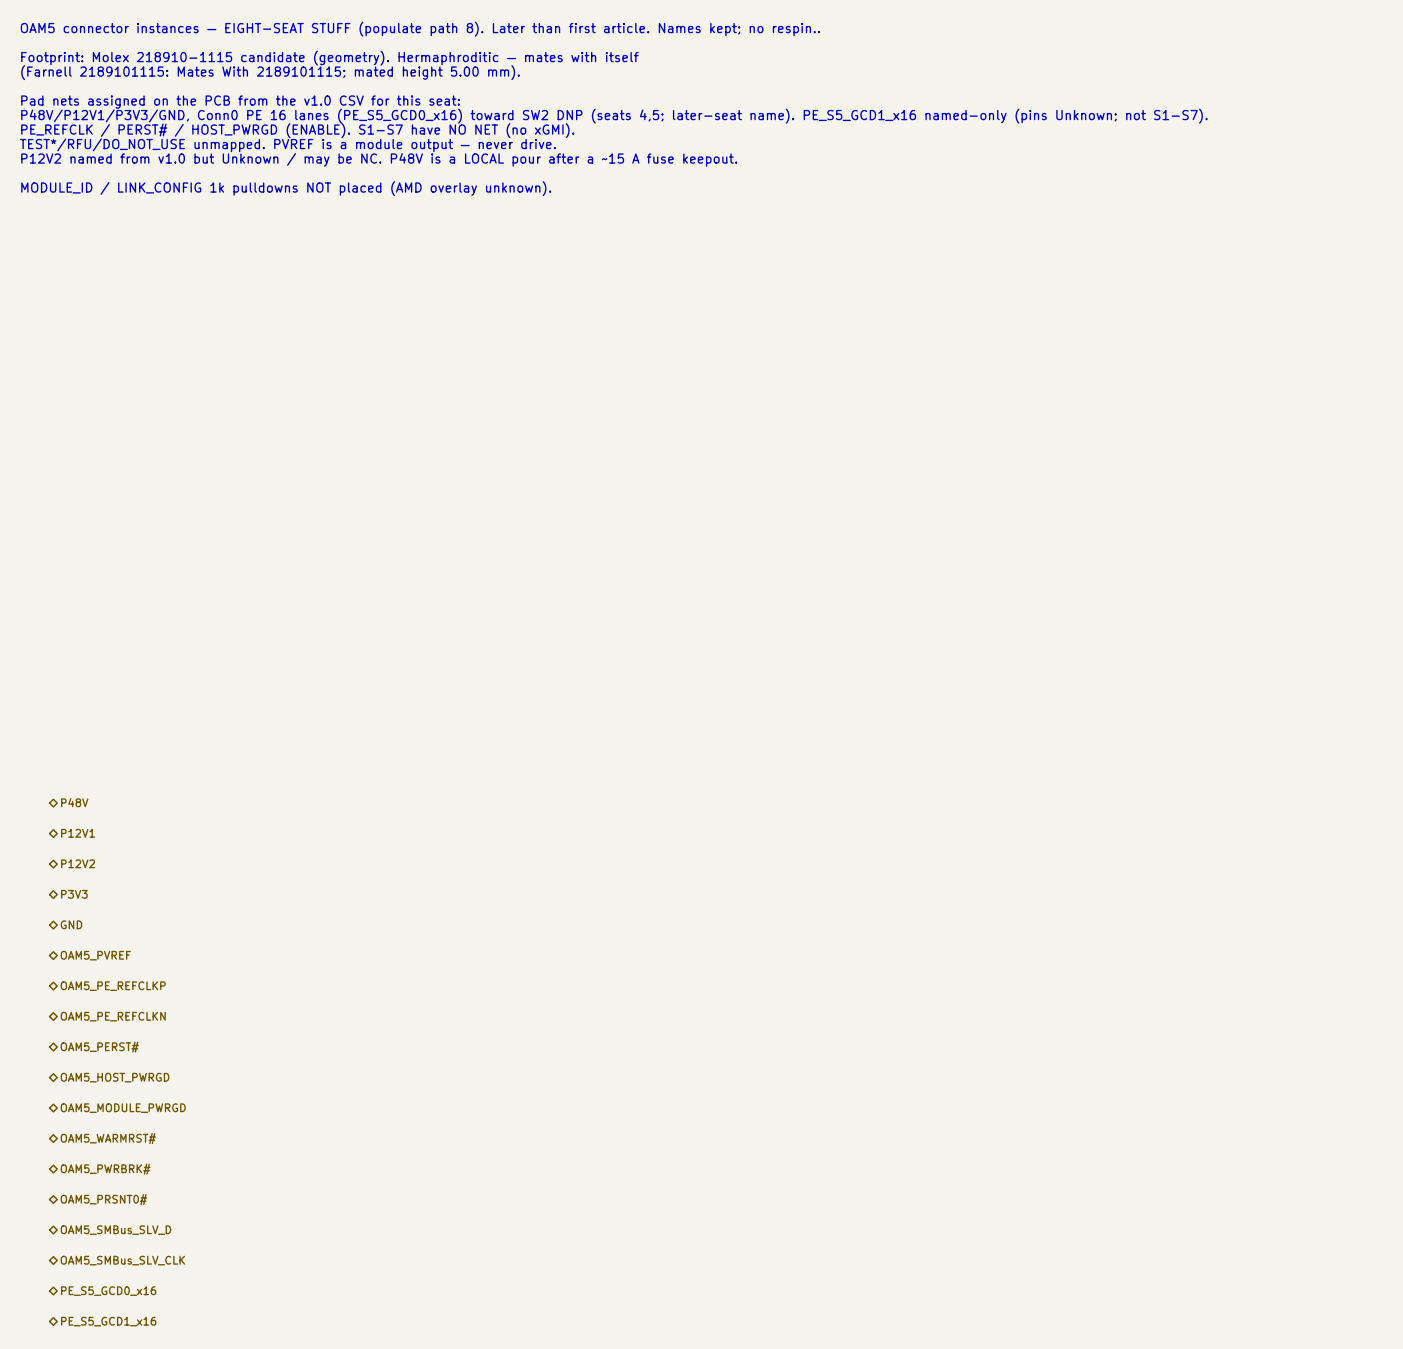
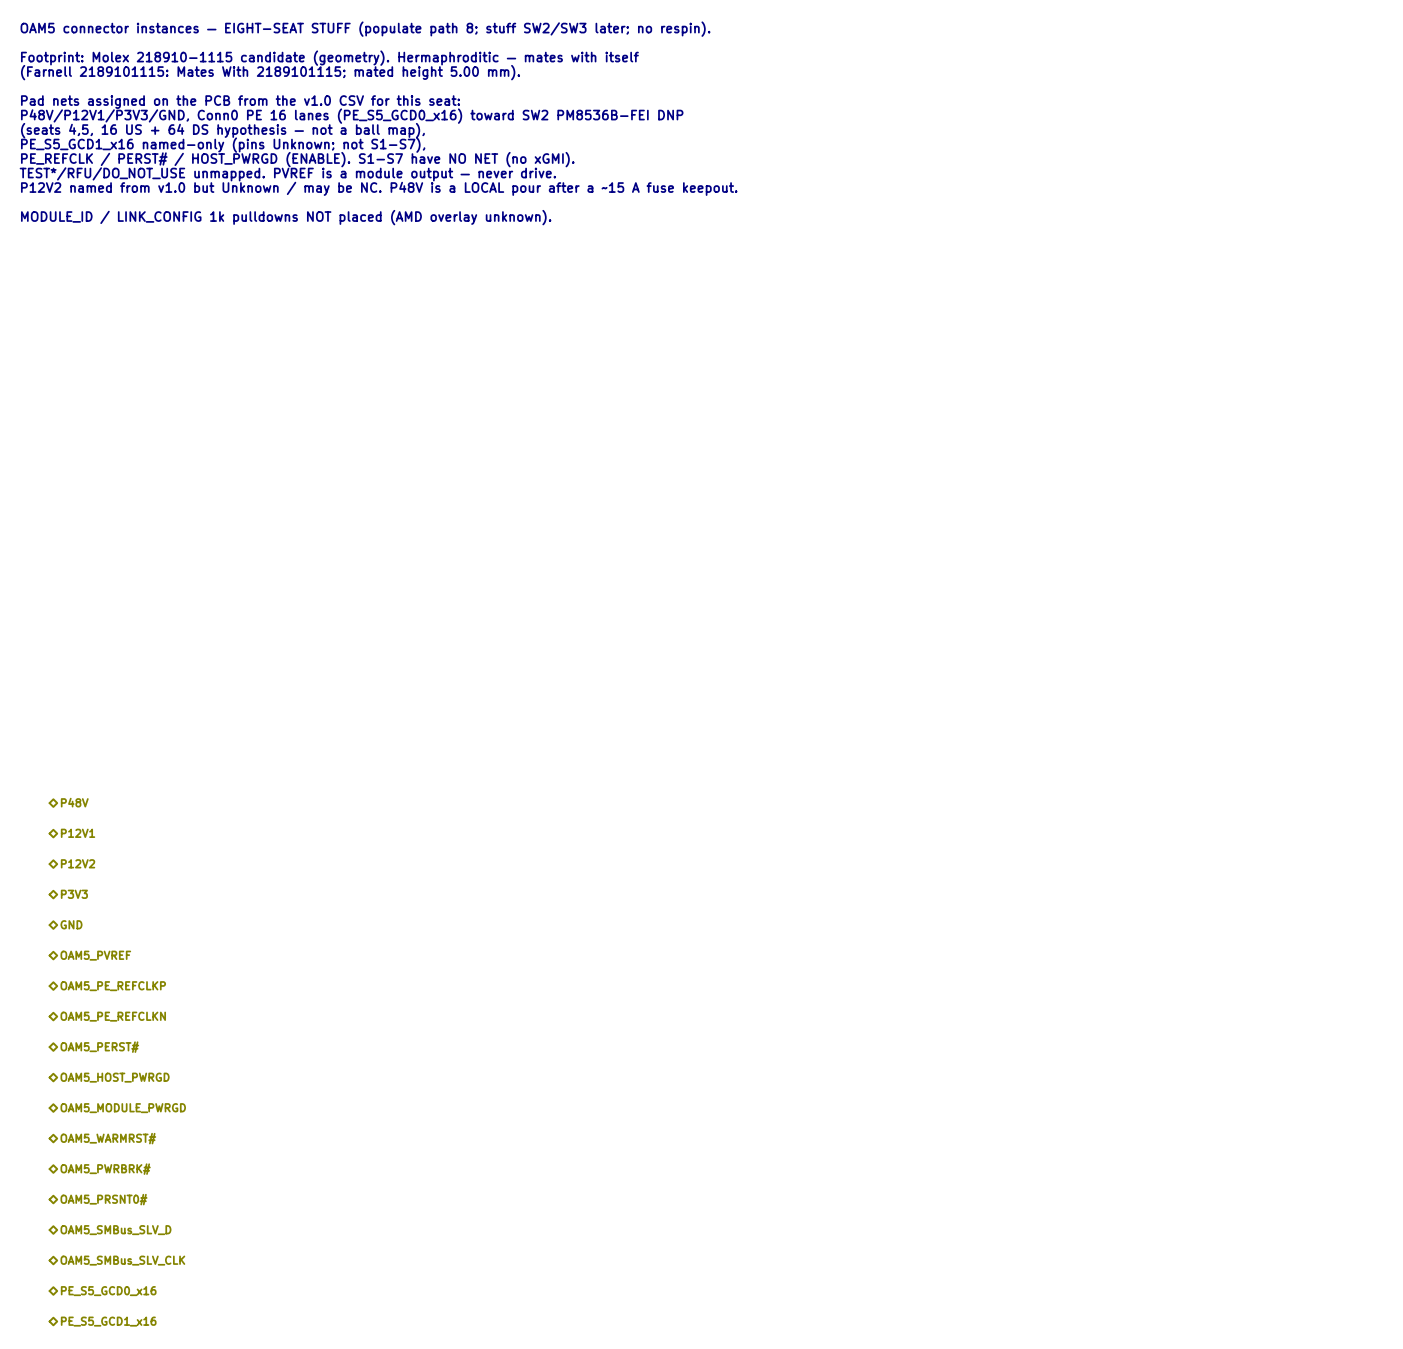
text: OAM5 connector instances — EIGHT-SEAT STUFF (populate path 8). Later than first article. Names kept; no respin.. (420, 29) -> OAM5 connector instances — EIGHT-SEAT STUFF (populate path 8; stuff SW2/SW3 later; no respin). (365, 29)
text: P48V/P12V1/P3V3/GND, Conn0 PE 16 lanes (PE_S5_GCD0_x16) toward SW2 DNP (seats 4,5; later-seat name). PE_S5_GCD1_x16 named-only (pins Unknown; not S1-S7). (614, 116) -> P48V/P12V1/P3V3/GND, Conn0 PE 16 lanes (PE_S5_GCD0_x16) toward SW2 PM8536B-FEI DNP (352, 116)
text: PE_REFCLK / PERST# / HOST_PWRGD (ENABLE). S1-S7 have NO NET (no xGMI). (297, 130) -> (seats 4,5, 16 US + 64 DS hypothesis — not a ball map), (222, 130)
text: TEST*/RFU/DO_NOT_USE unmapped. PVREF is a module output — never drive. (287, 145) -> PE_S5_GCD1_x16 named-only (pins Unknown; not S1-S7), (223, 145)
text: P12V2 named from v1.0 but Unknown / may be NC. P48V is a LOCAL pour after a ~15 A fuse keepout. (379, 159) -> PE_REFCLK / PERST# / HOST_PWRGD (ENABLE). S1-S7 have NO NET (no xGMI). (297, 159)
text: none -> TEST*/RFU/DO_NOT_USE unmapped. PVREF is a module output — never drive. (287, 174)
text: MODULE_ID / LINK_CONFIG 1k pulldowns NOT placed (AMD overlay unknown). (286, 188) -> P12V2 named from v1.0 but Unknown / may be NC. P48V is a LOCAL pour after a ~15 A fuse keepout. (379, 188)
text: none -> MODULE_ID / LINK_CONFIG 1k pulldowns NOT placed (AMD overlay unknown). (286, 217)

